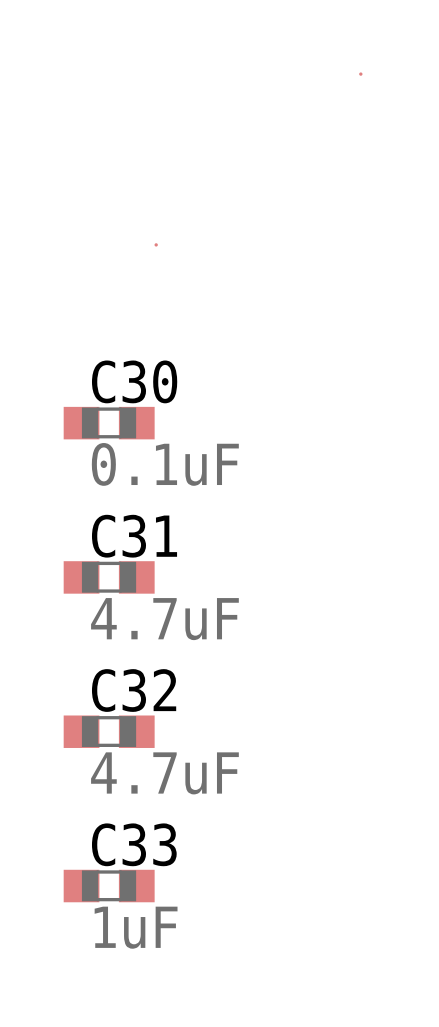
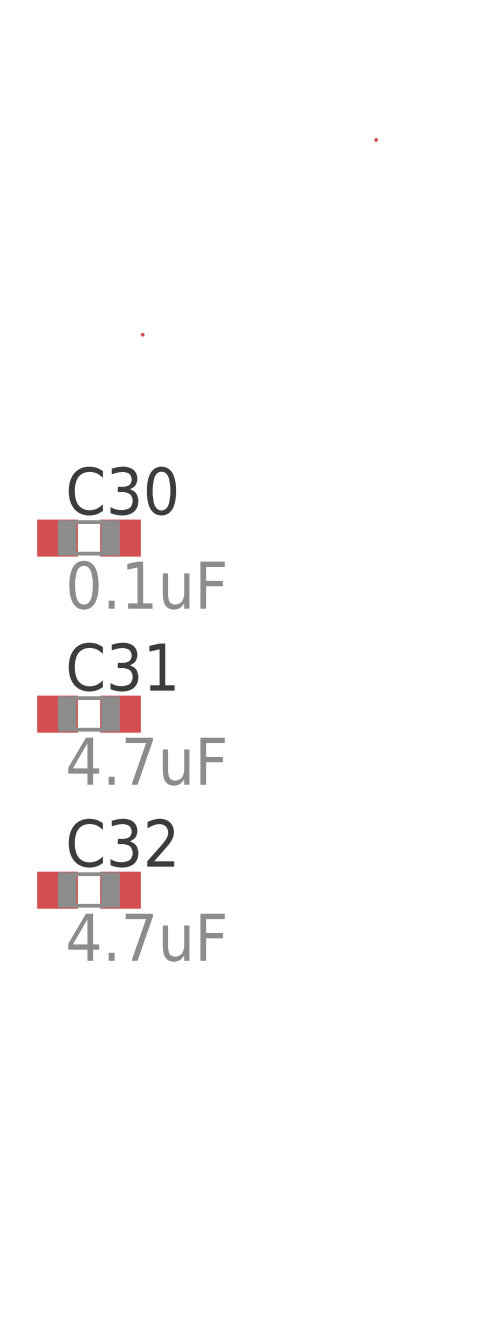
C33: 1uF (109, 886) -> none

